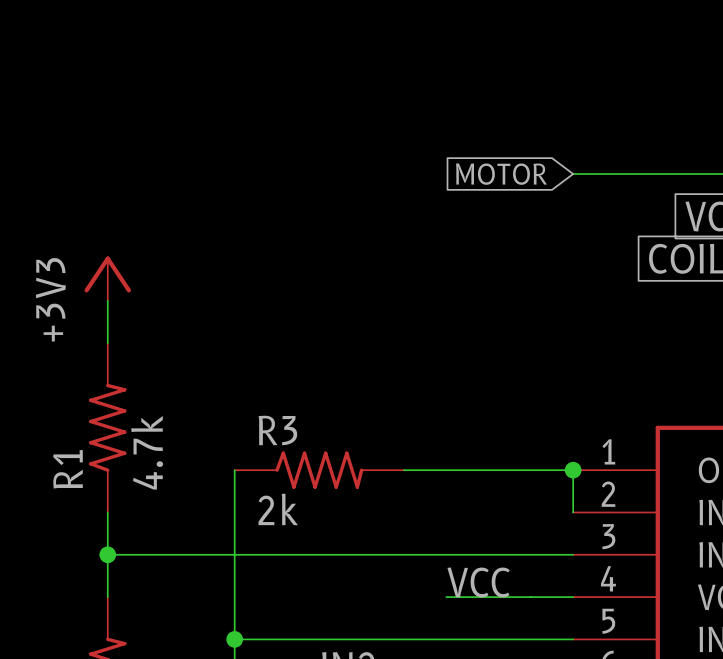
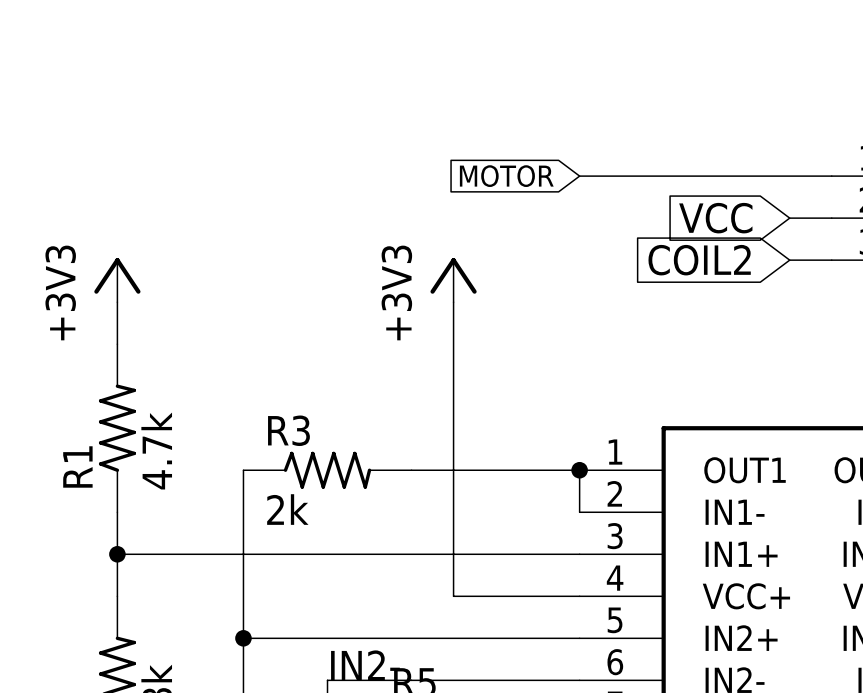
power symbol: none -> +3V3 (453, 280)
wire: none -> (453, 302) (453, 596)
label: VCC (478, 582) -> none

